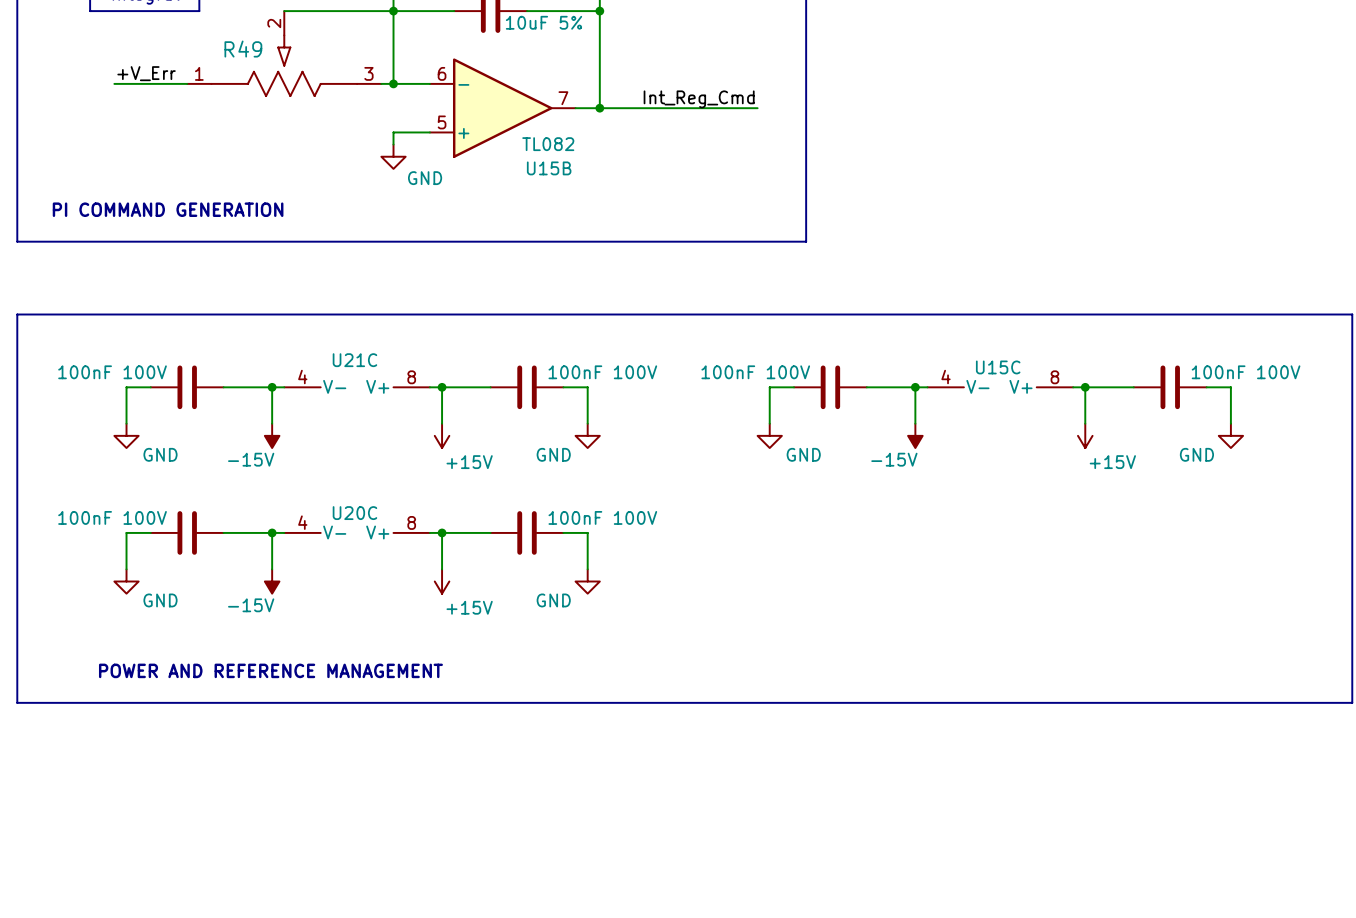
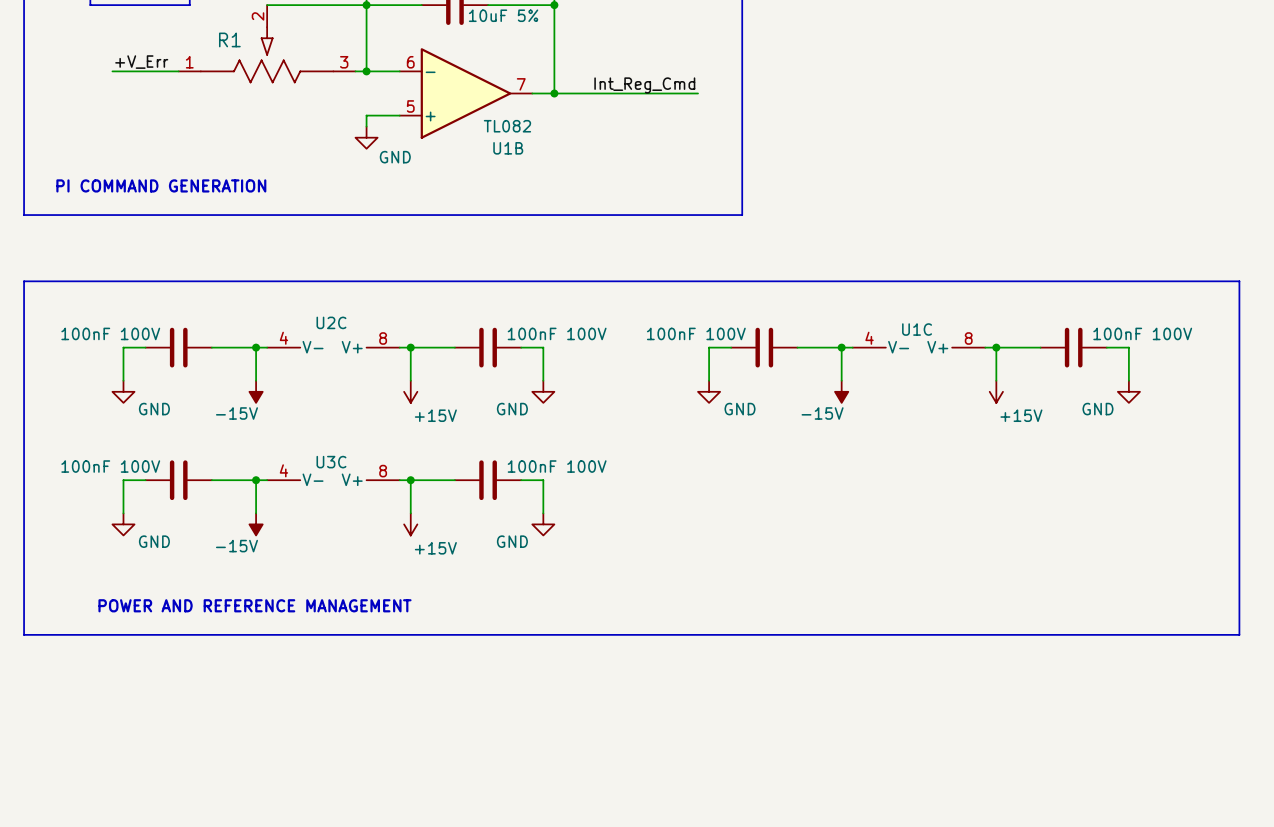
R49 name: R49 (243, 49) -> R1 (229, 39)
U15B name: U15B (549, 168) -> U1B (508, 148)
U21C name: U21C (354, 360) -> U2C (331, 322)
U15C name: U15C (998, 367) -> U1C (917, 329)
U20C name: U20C (354, 513) -> U3C (331, 462)

